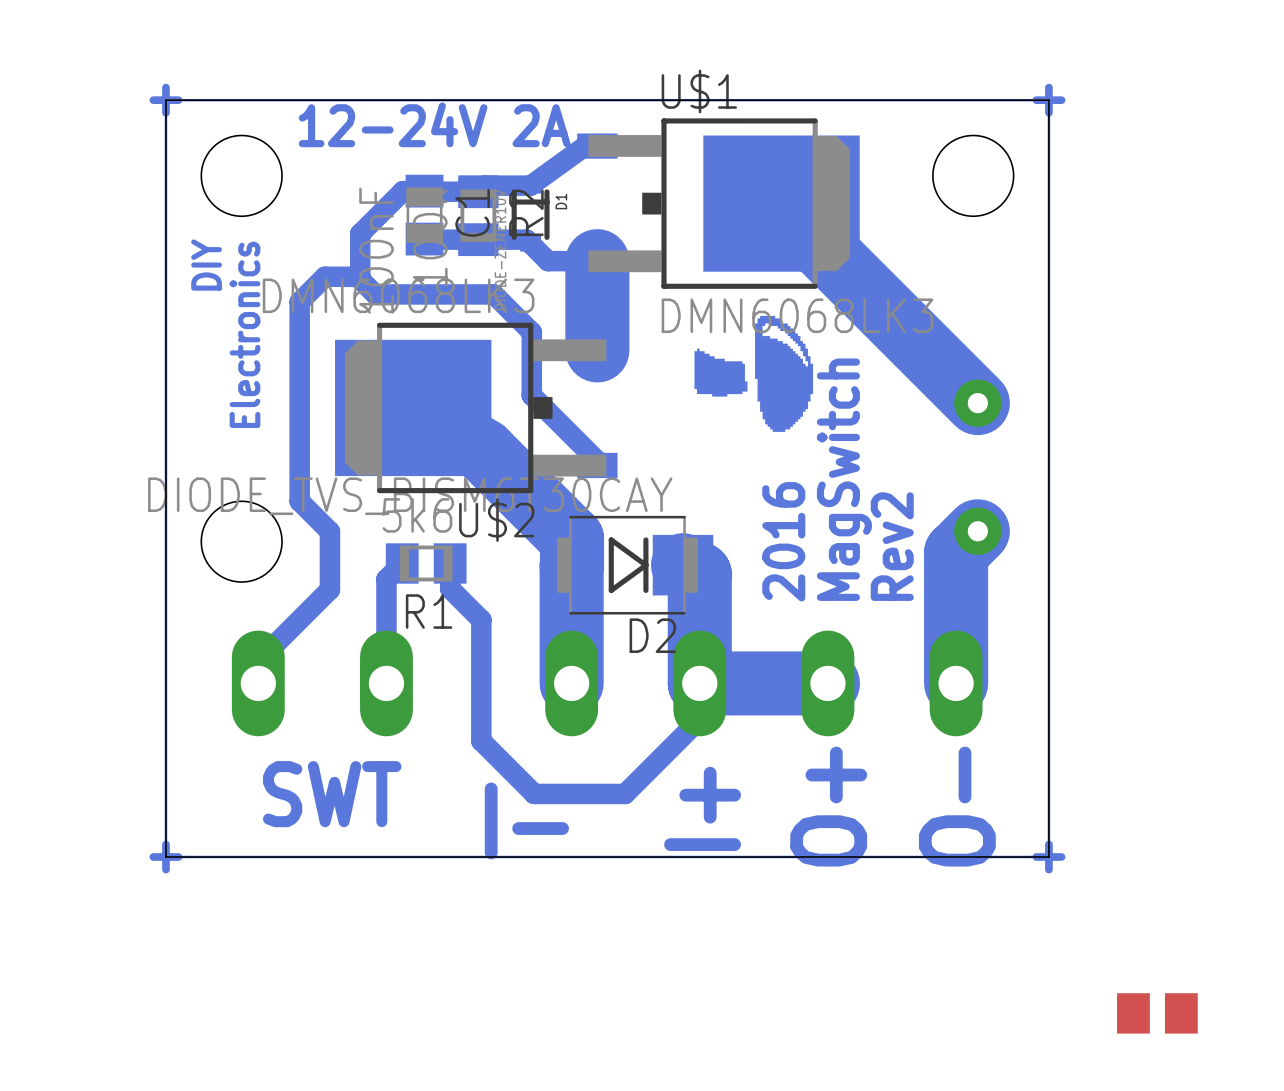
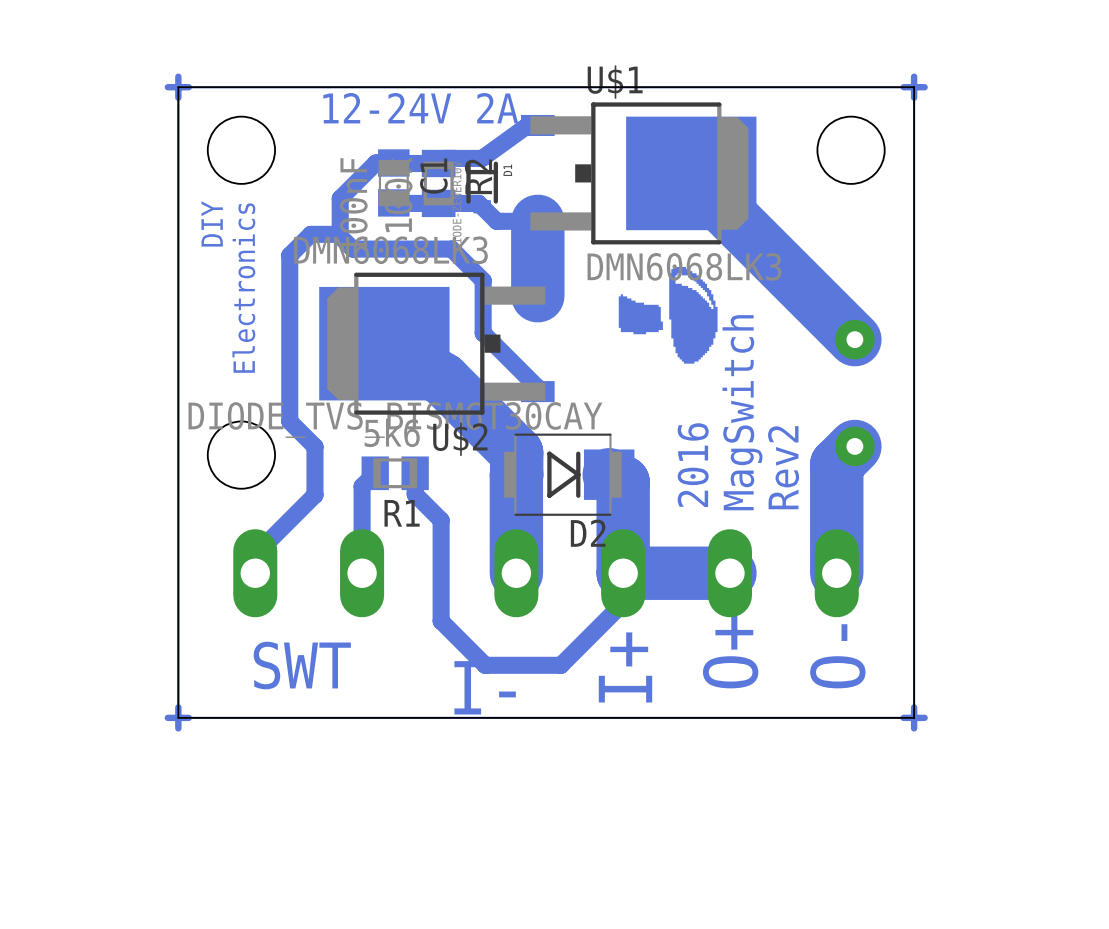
part: (1157, 1013) -> none

